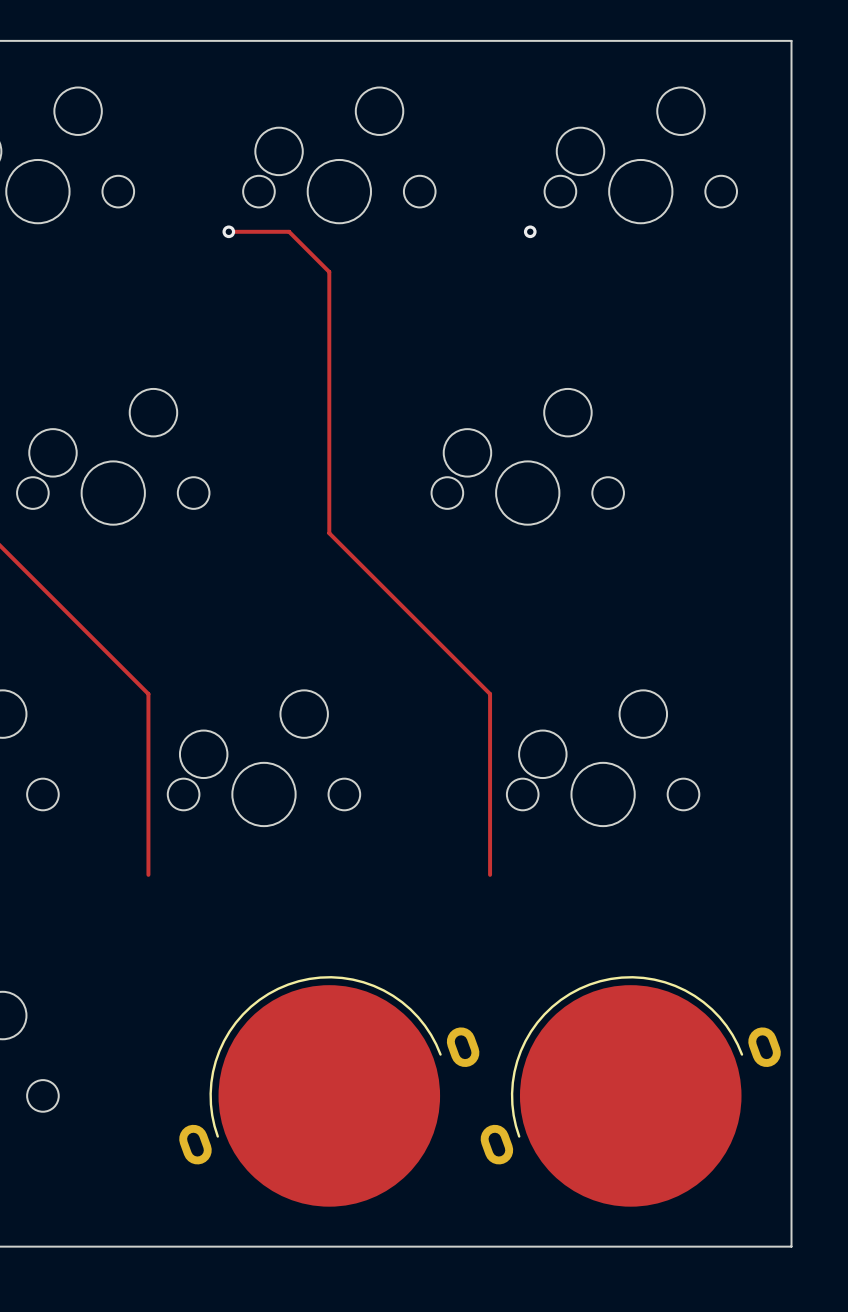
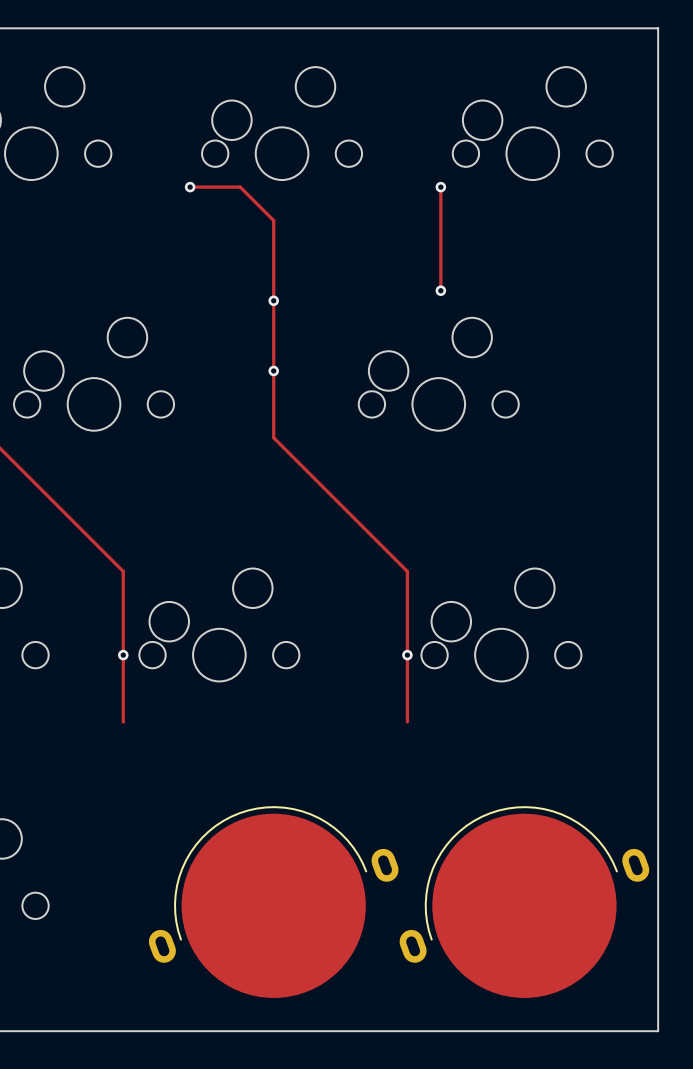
track: none -> (440, 187) (440, 290)
via: none -> (440, 290)
via: none -> (273, 300)
via: none -> (273, 370)
via: none -> (123, 655)
via: none -> (407, 655)

